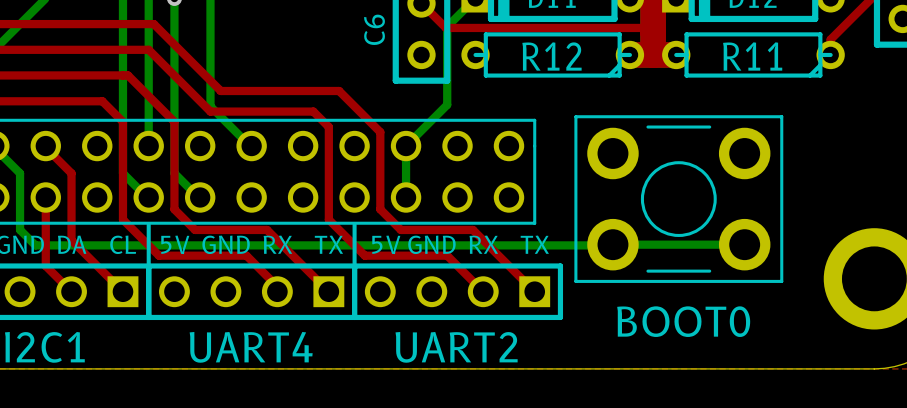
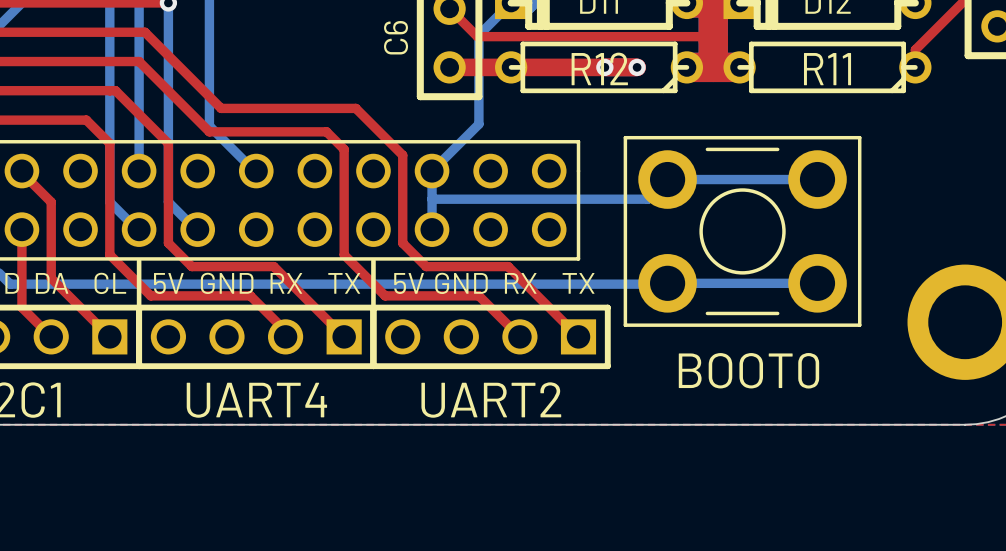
top track: none -> (449, 67) (637, 67)
via: none -> (604, 67)
via: none -> (637, 67)
bottom track: none -> (817, 179) (667, 179) (647, 199) (432, 199)

